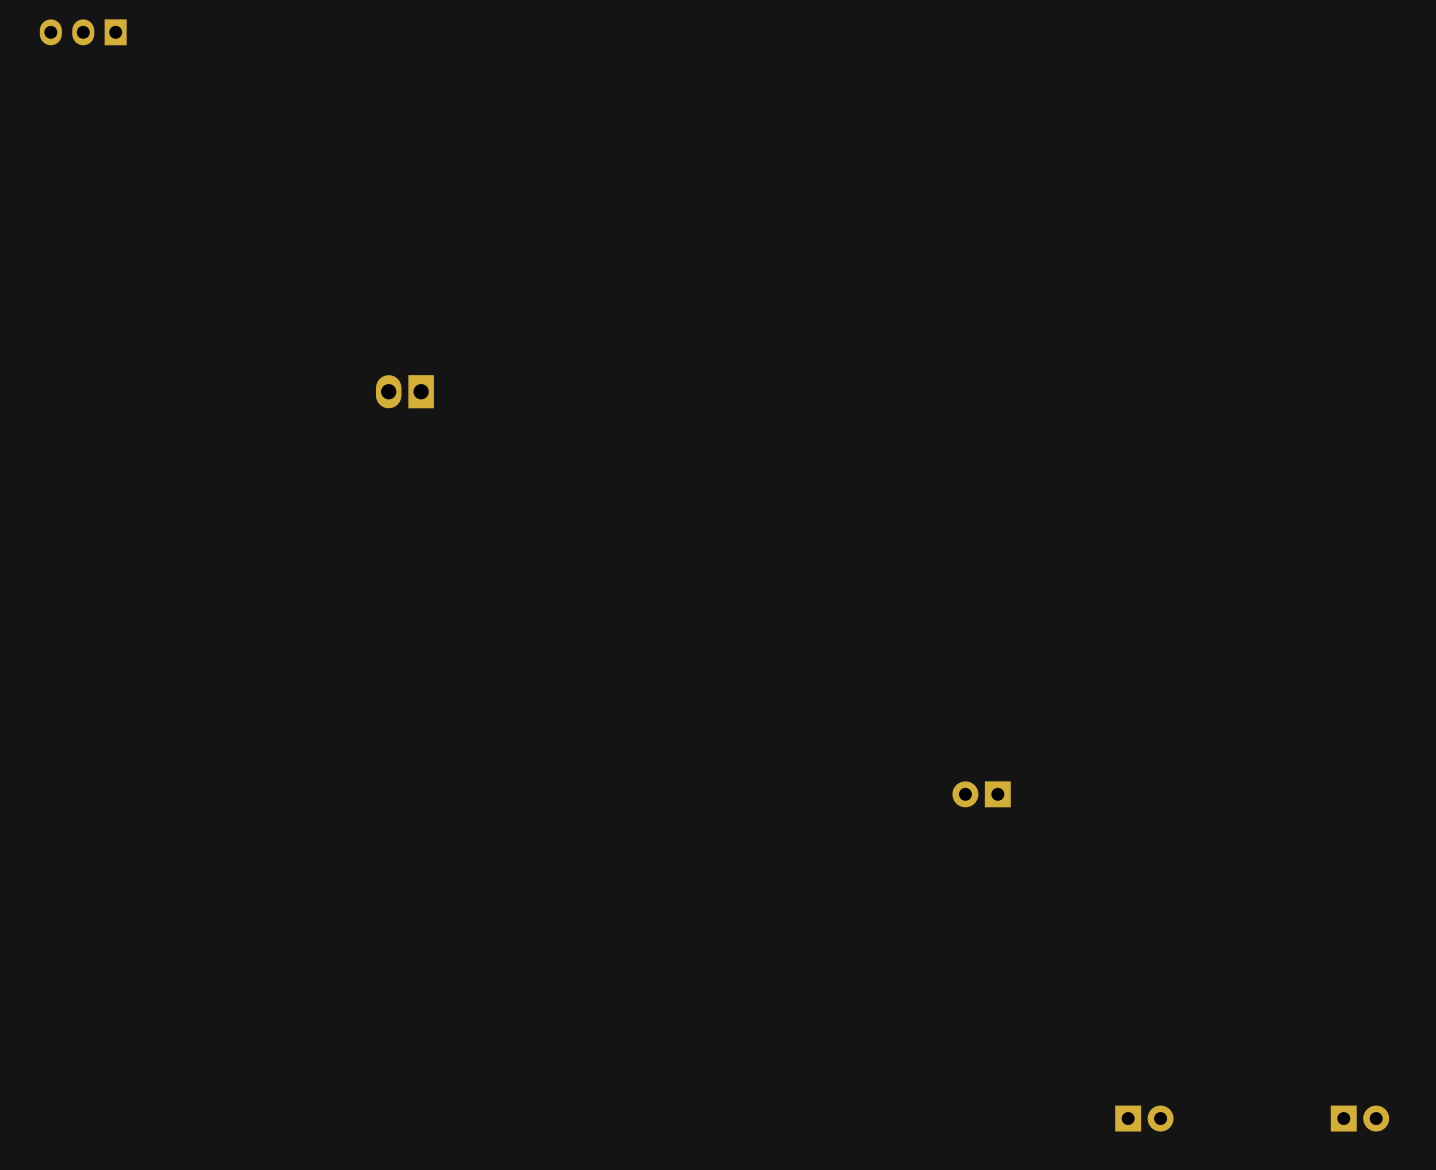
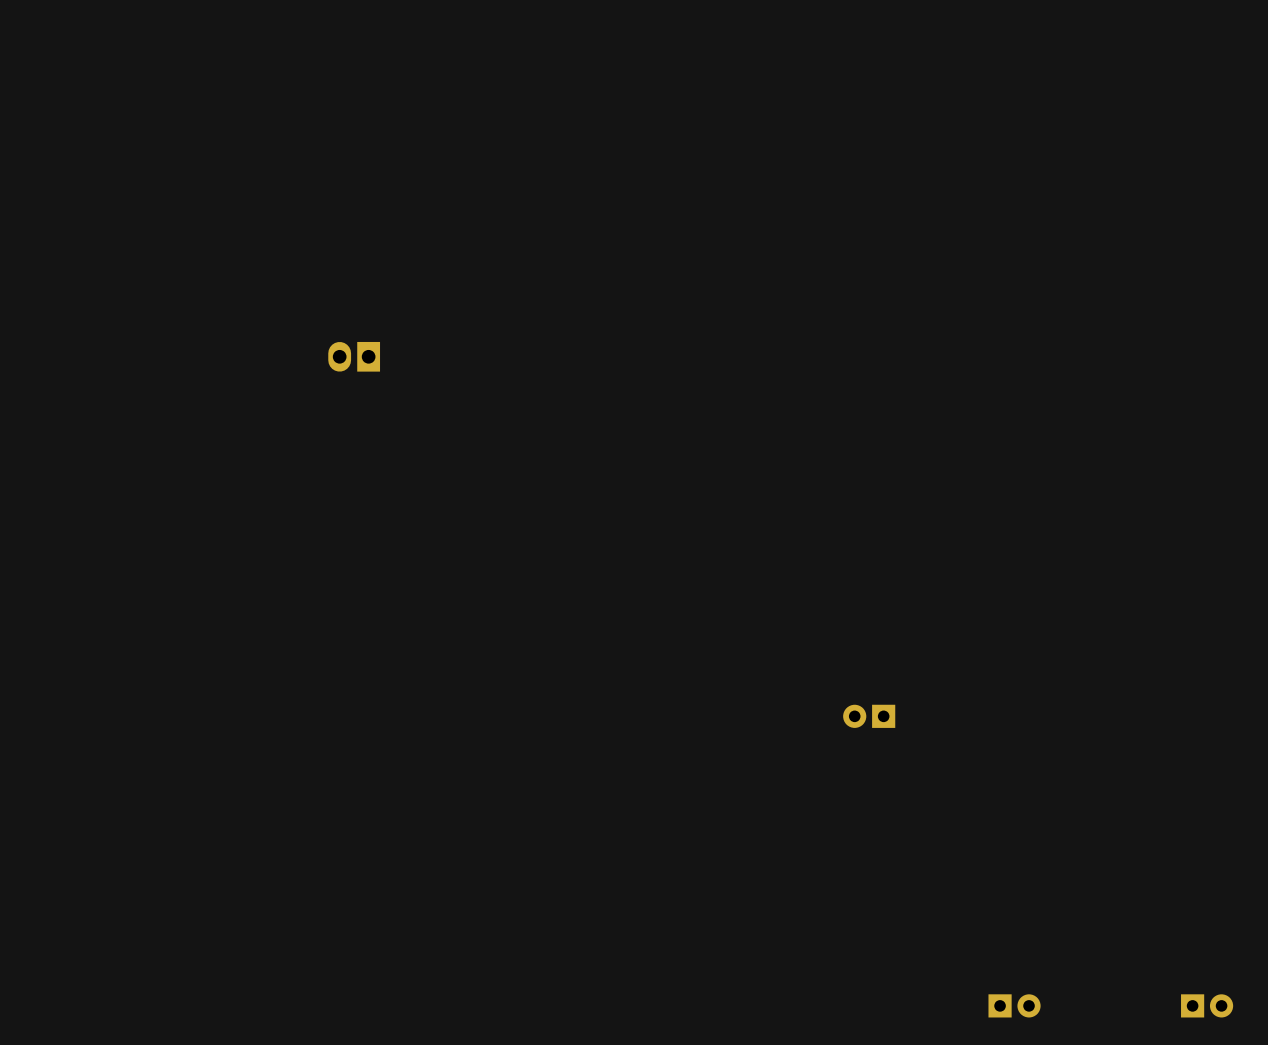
part: (83, 32) -> none

